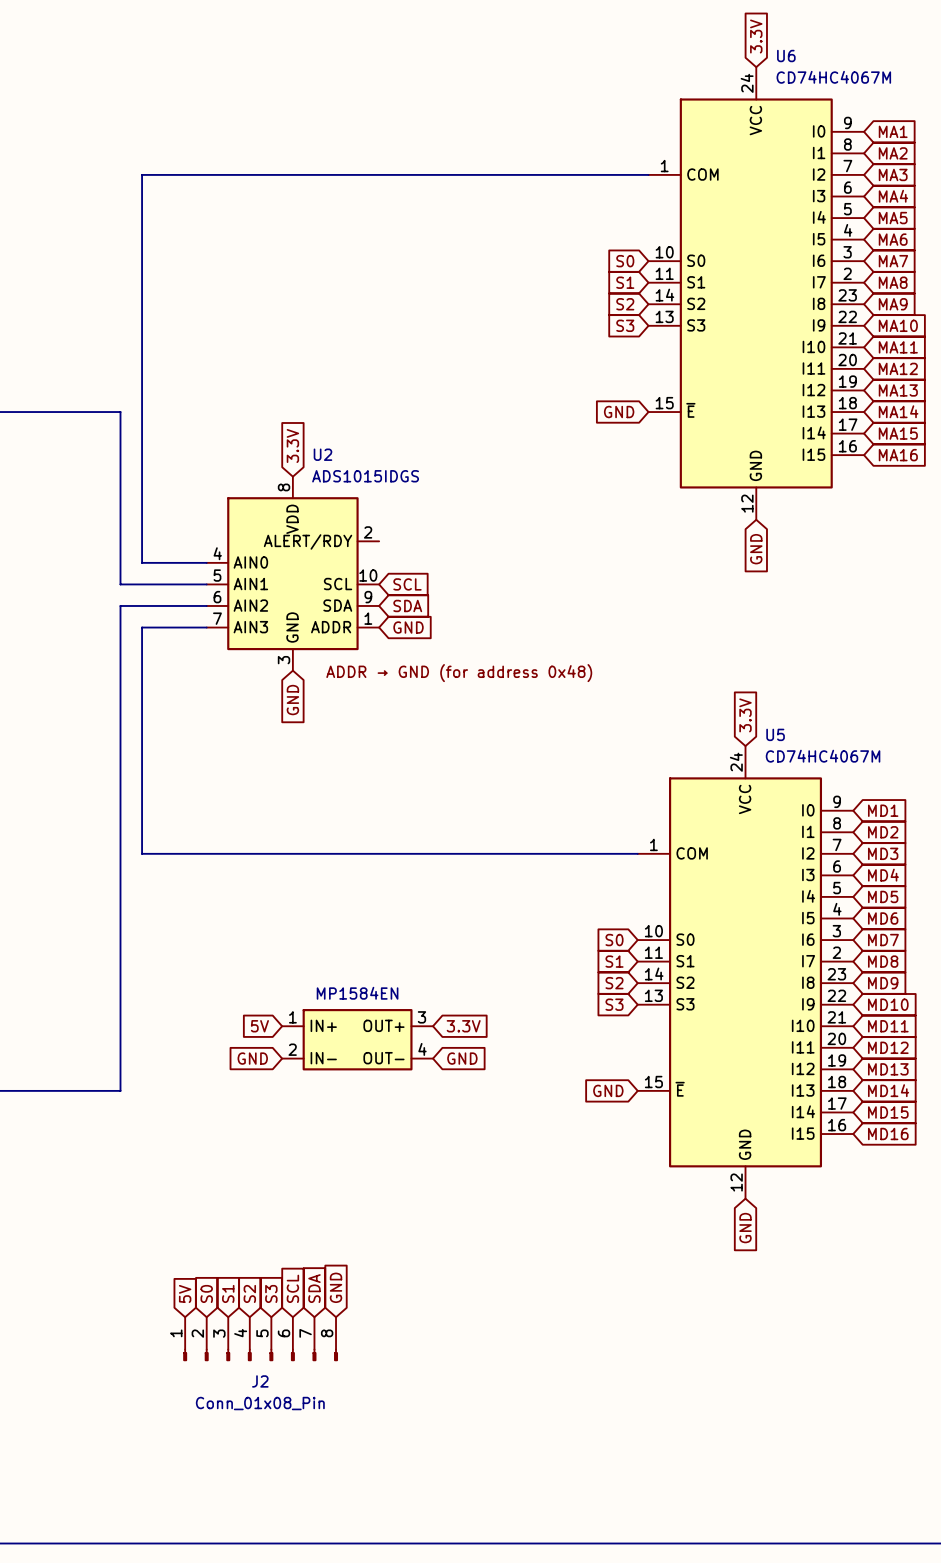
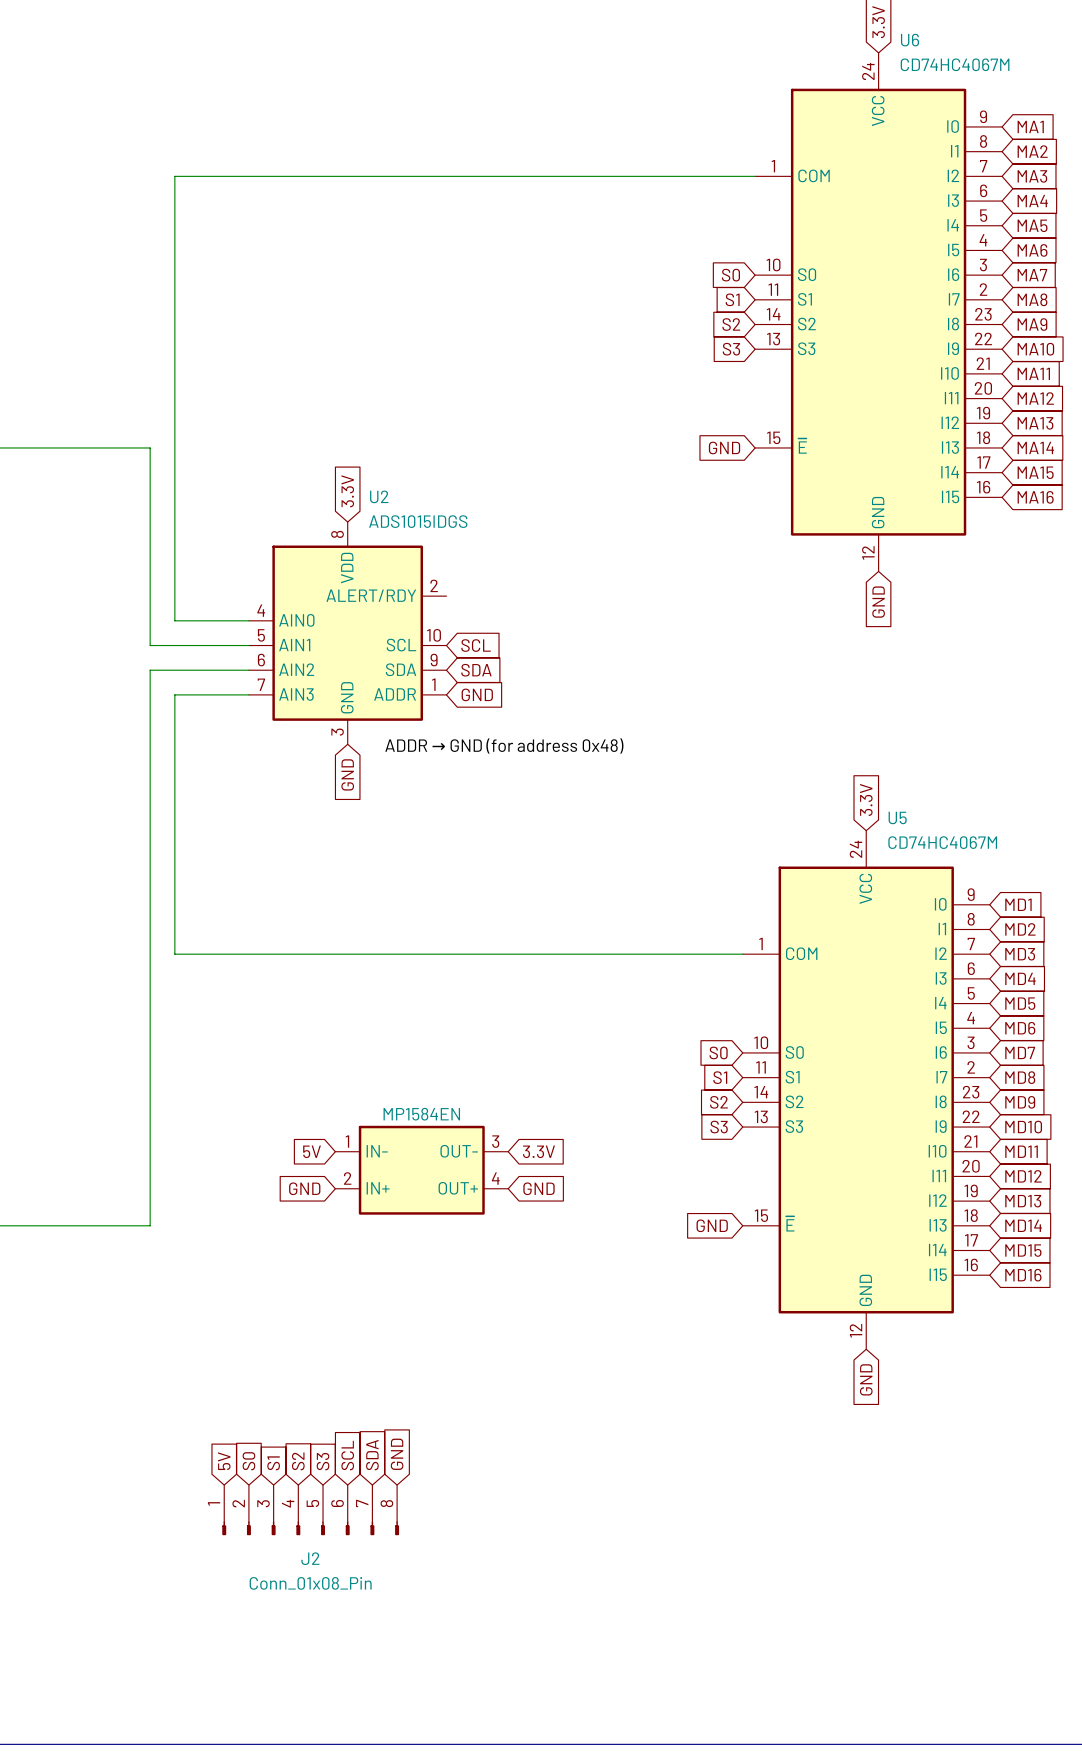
part symbol: [282, 1009, 434, 1071] -> [335, 1125, 509, 1215]

